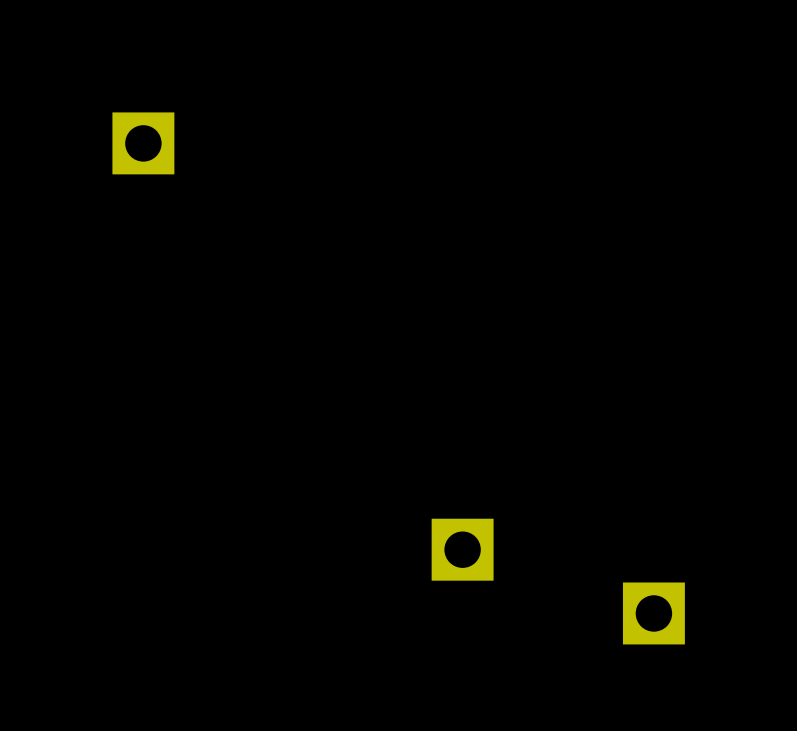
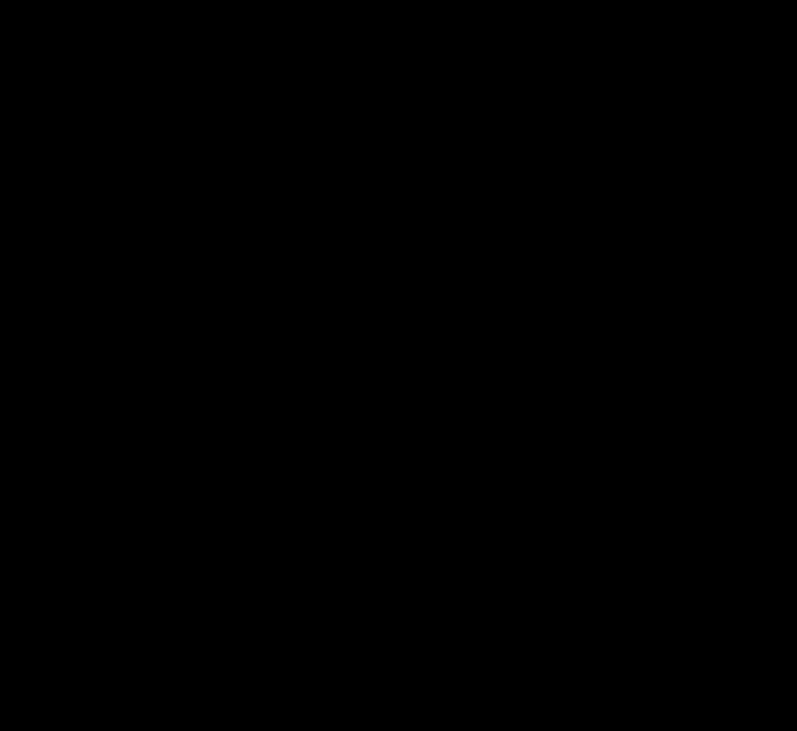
part: (143, 143) -> none
part: (462, 549) -> none
part: (653, 613) -> none

